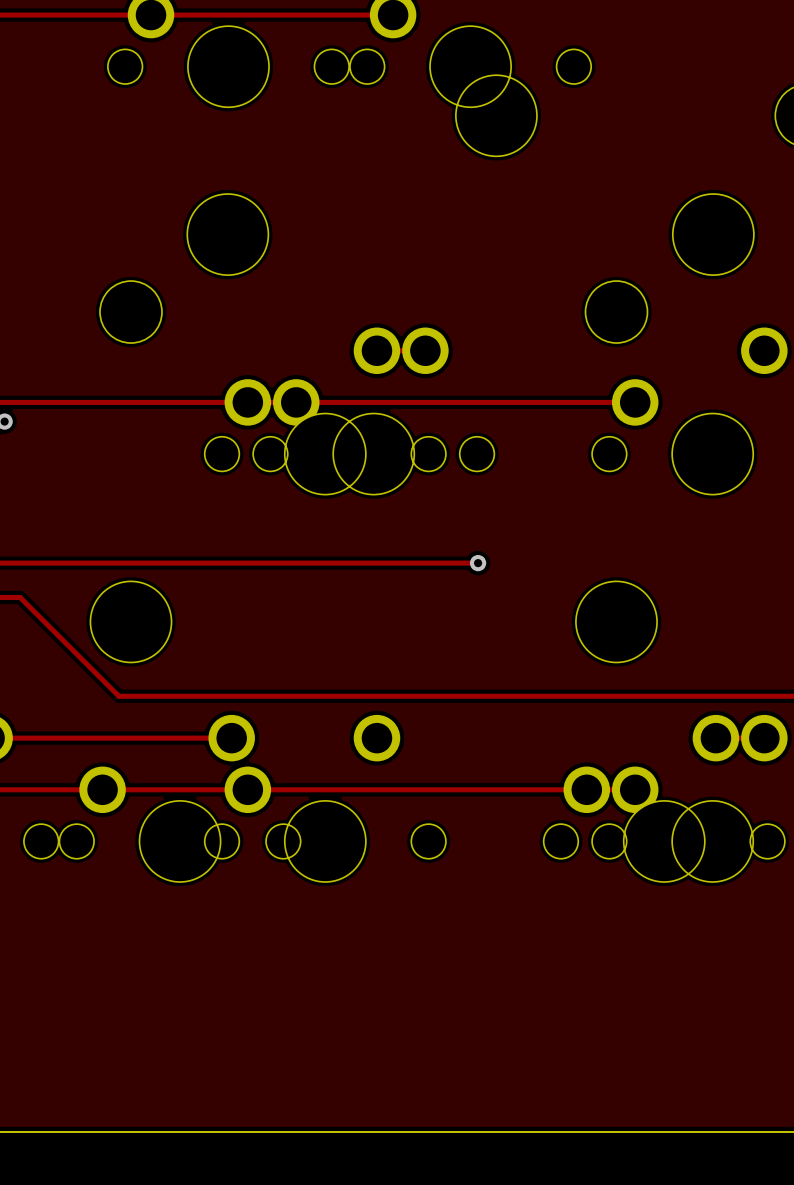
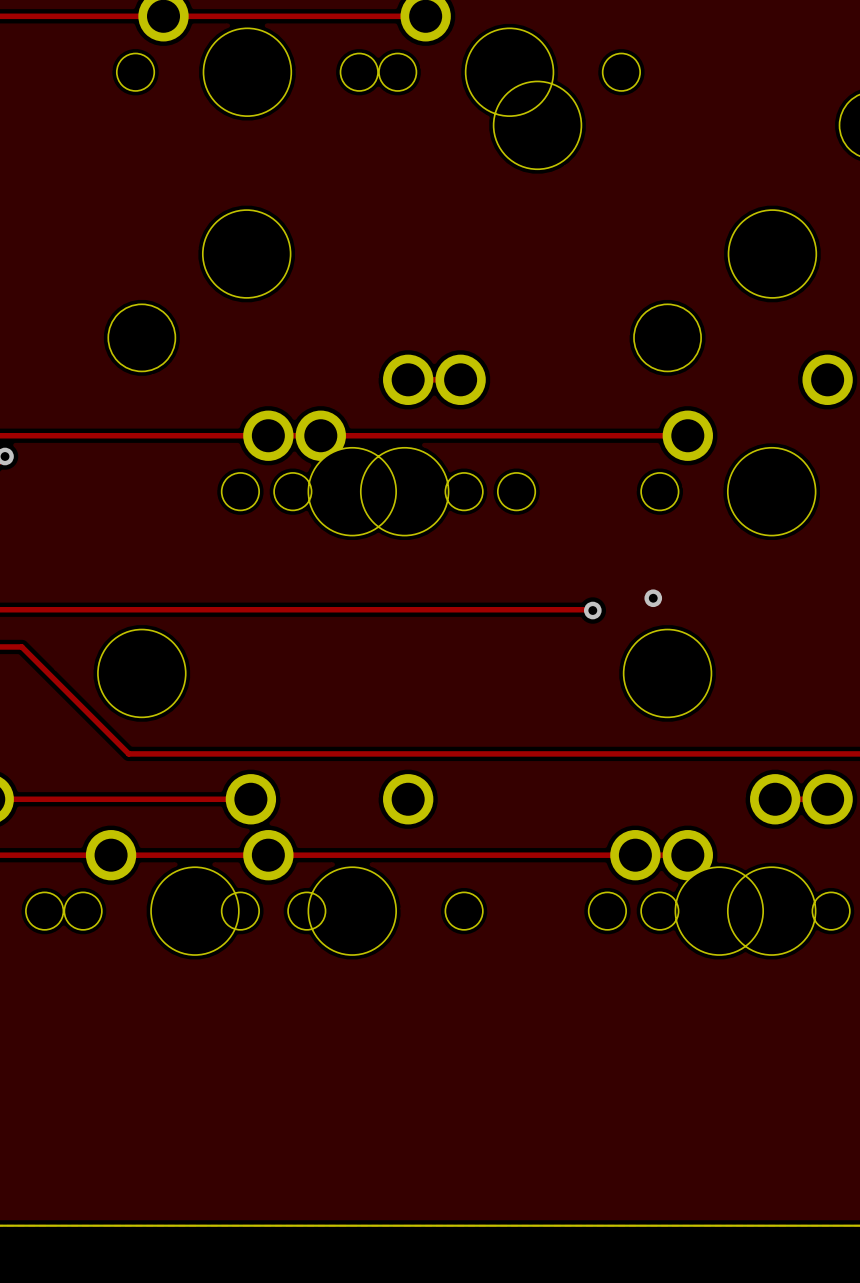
via: none -> (653, 598)
track: none -> (517, 609) (592, 610)
via: (478, 563) -> none
via: none -> (592, 610)

